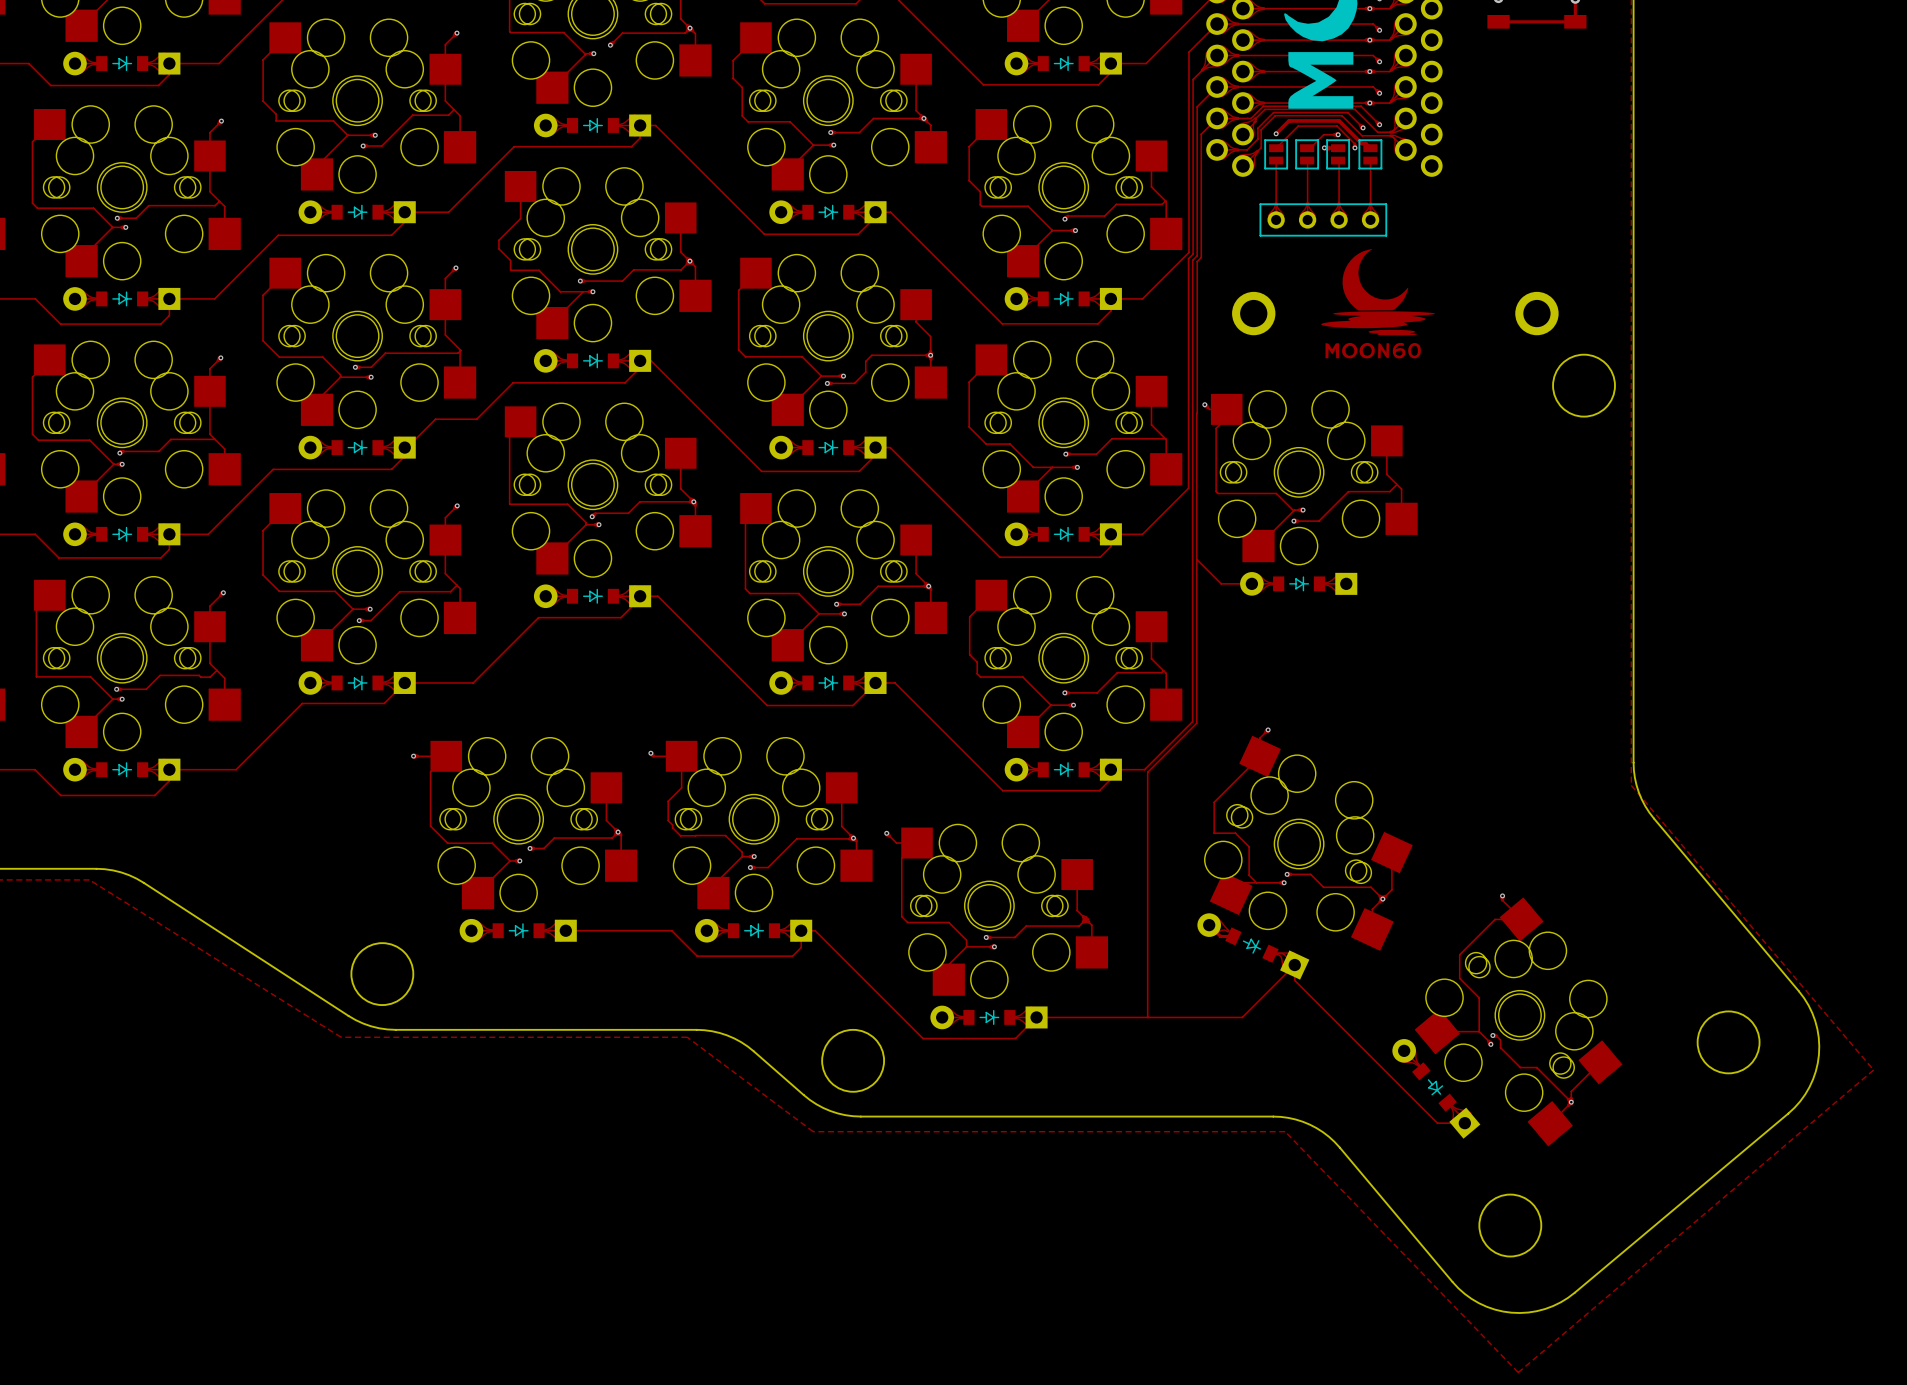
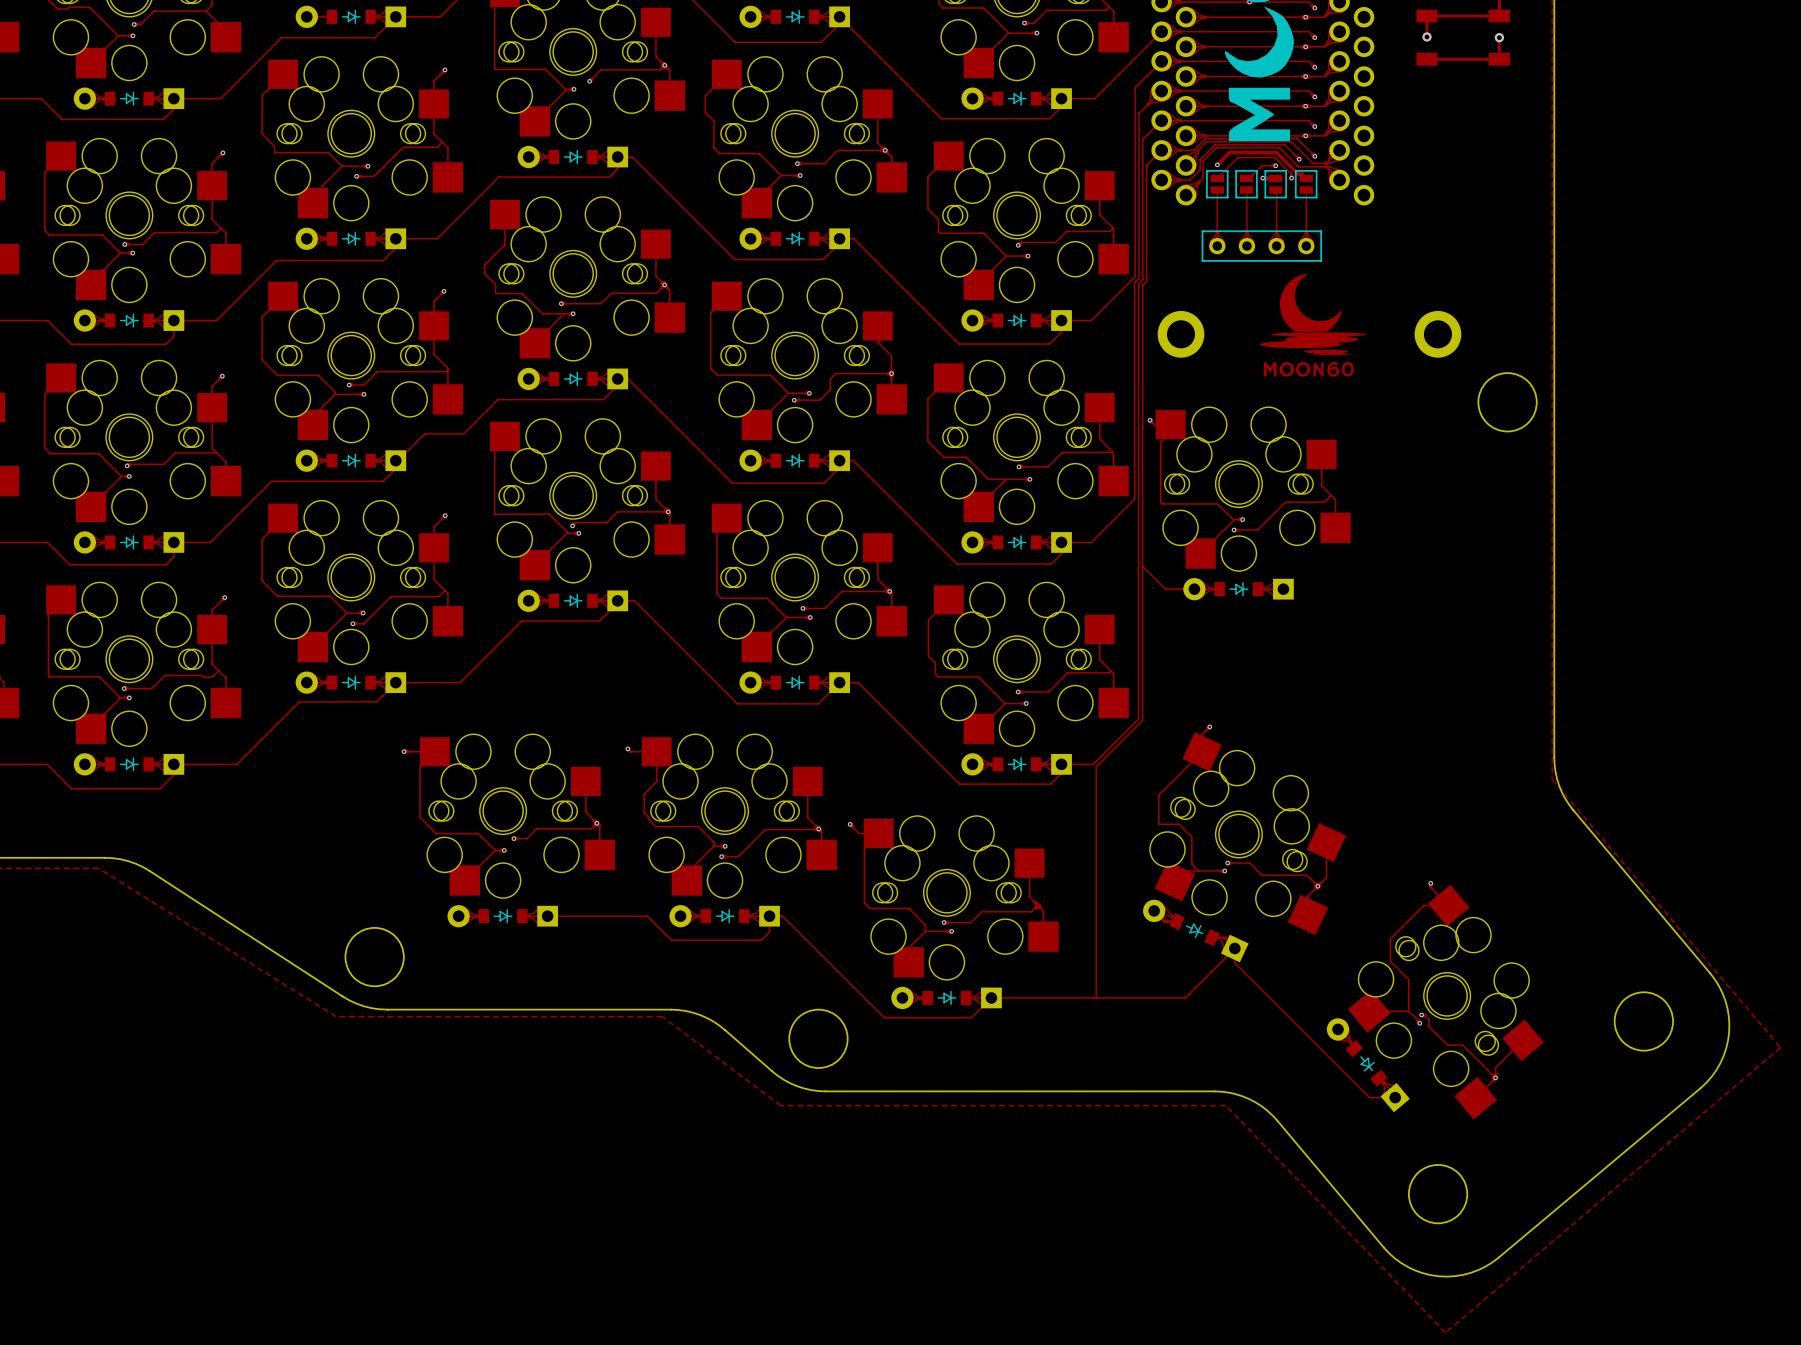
part: none -> (1181, 334)
part: (1253, 313) -> none
part: none -> (1437, 334)
part: (1536, 313) -> none

